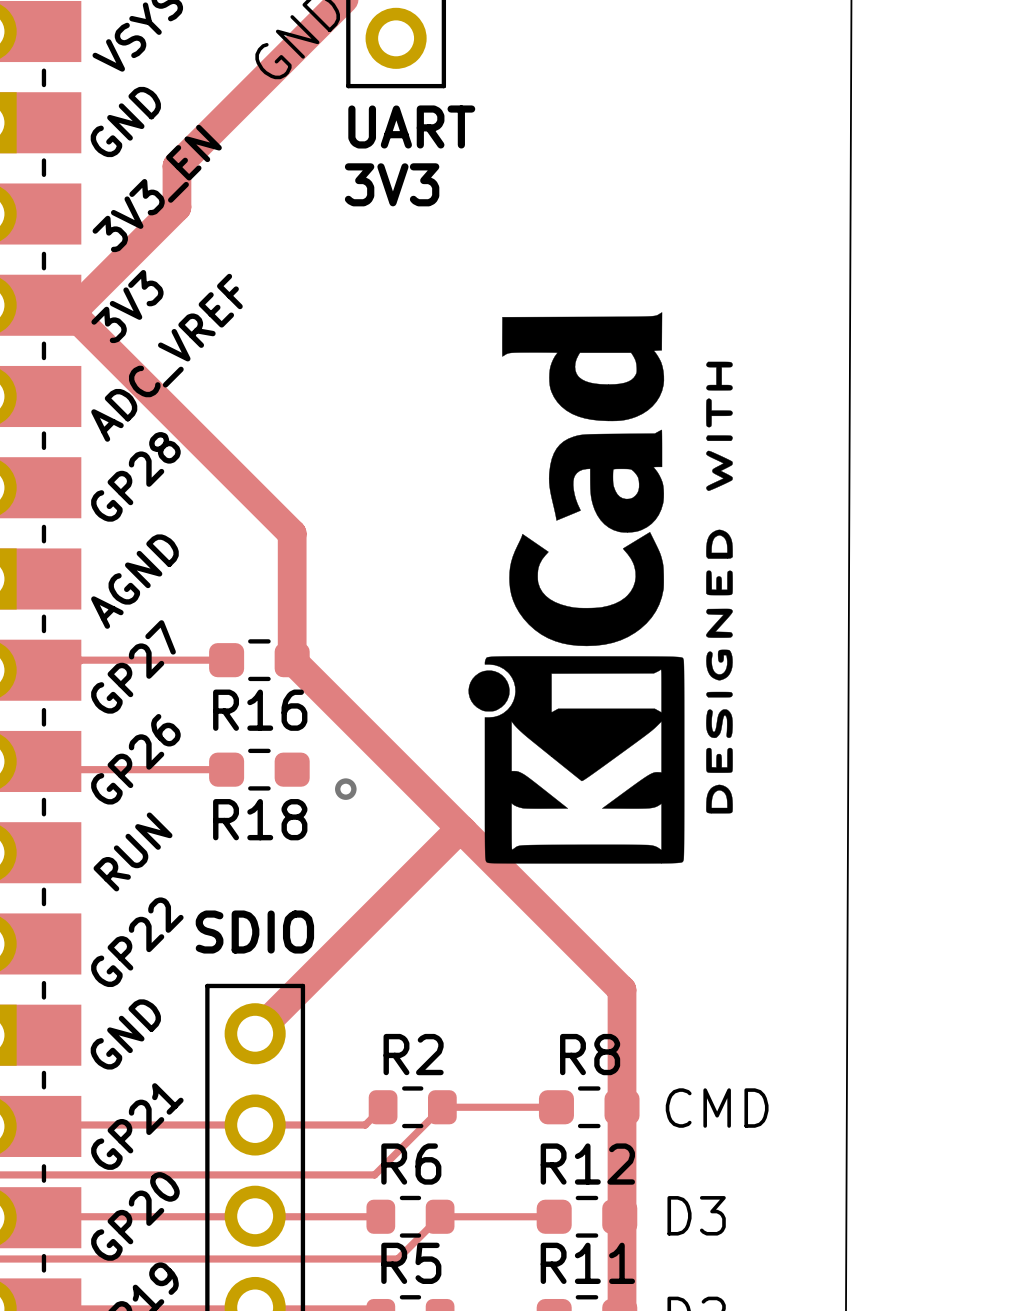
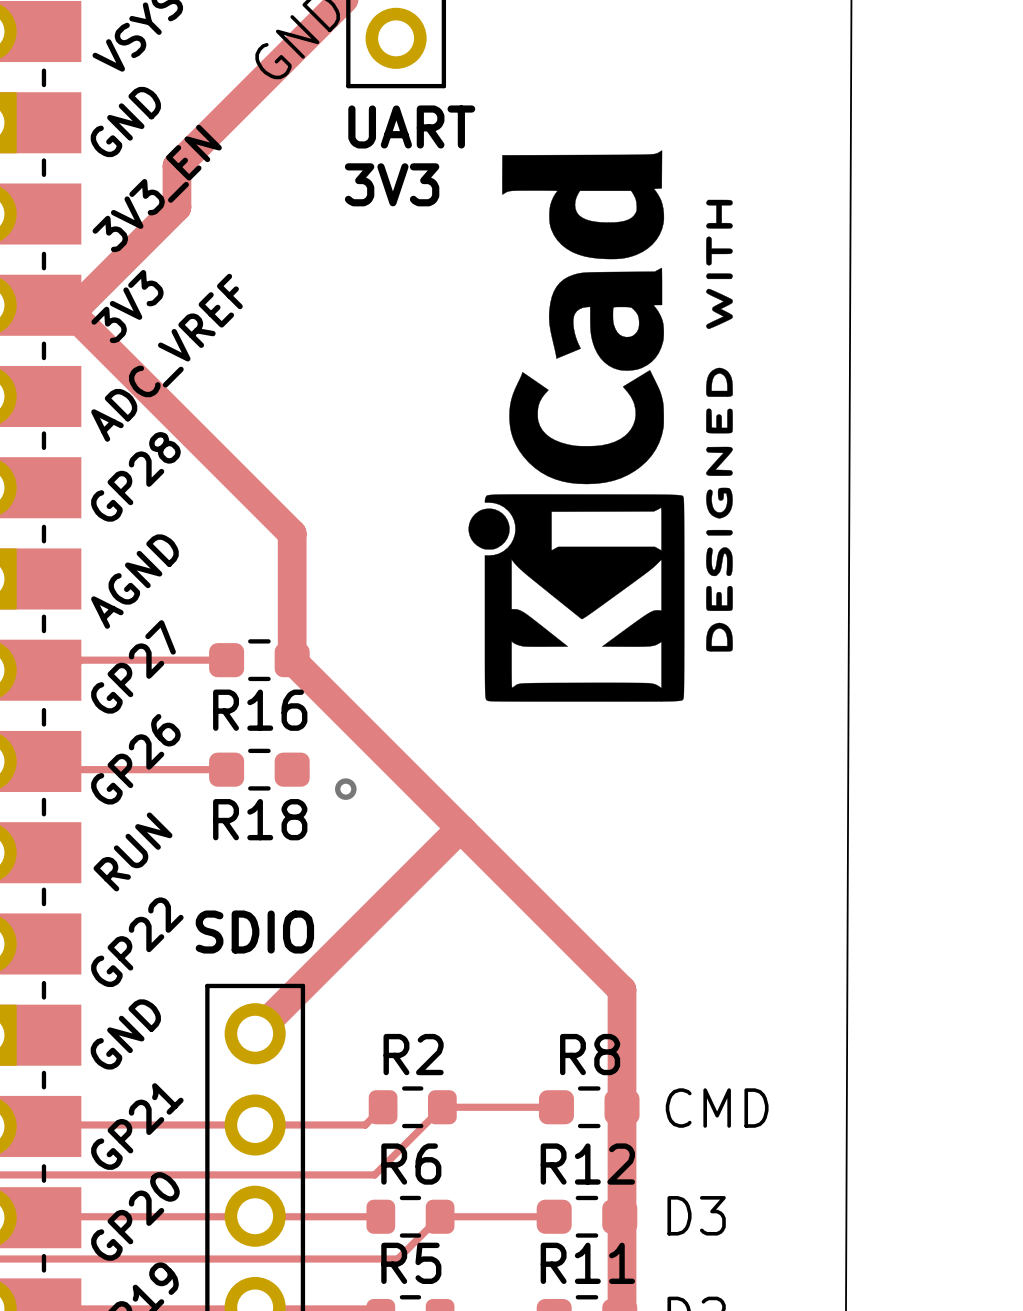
drawing position: (600, 587) -> (600, 426)

